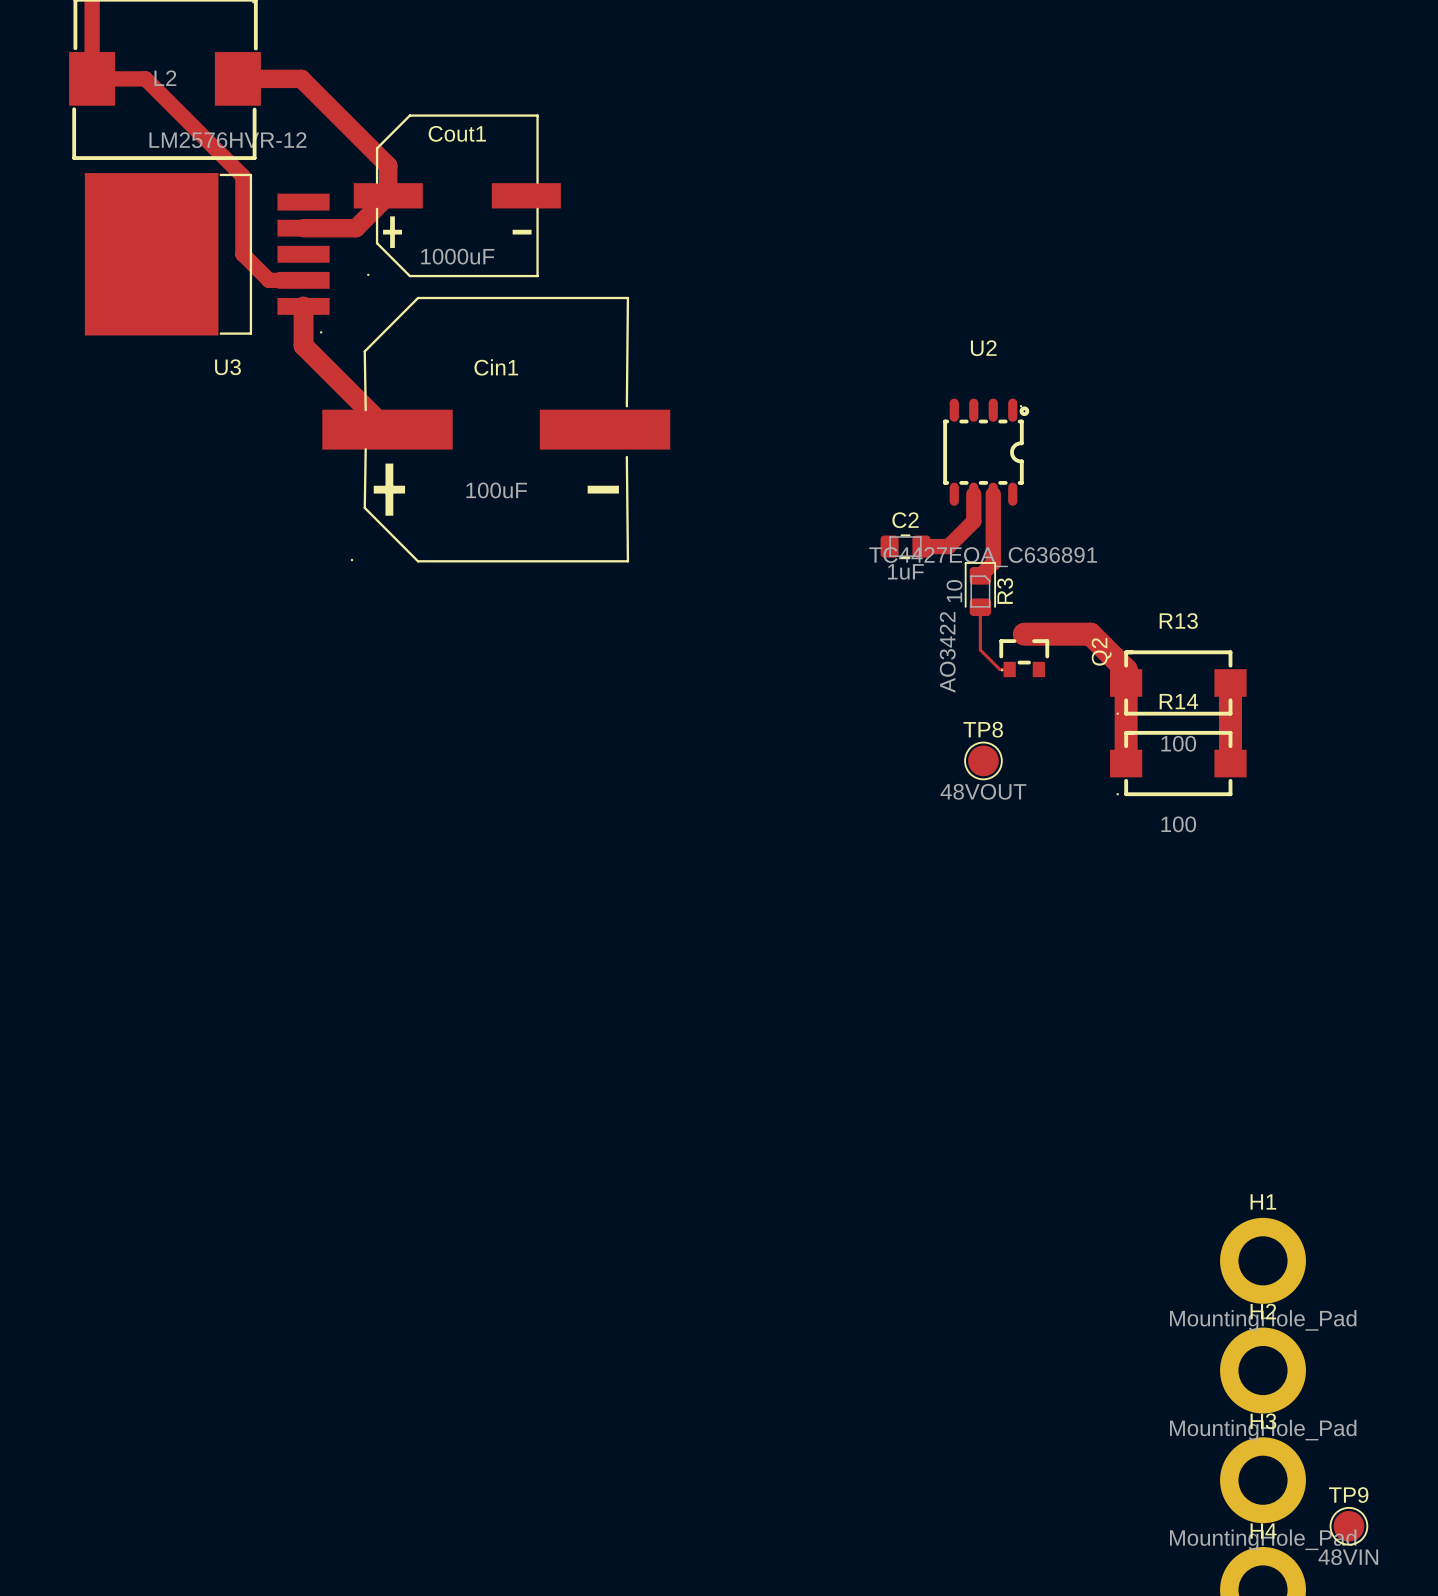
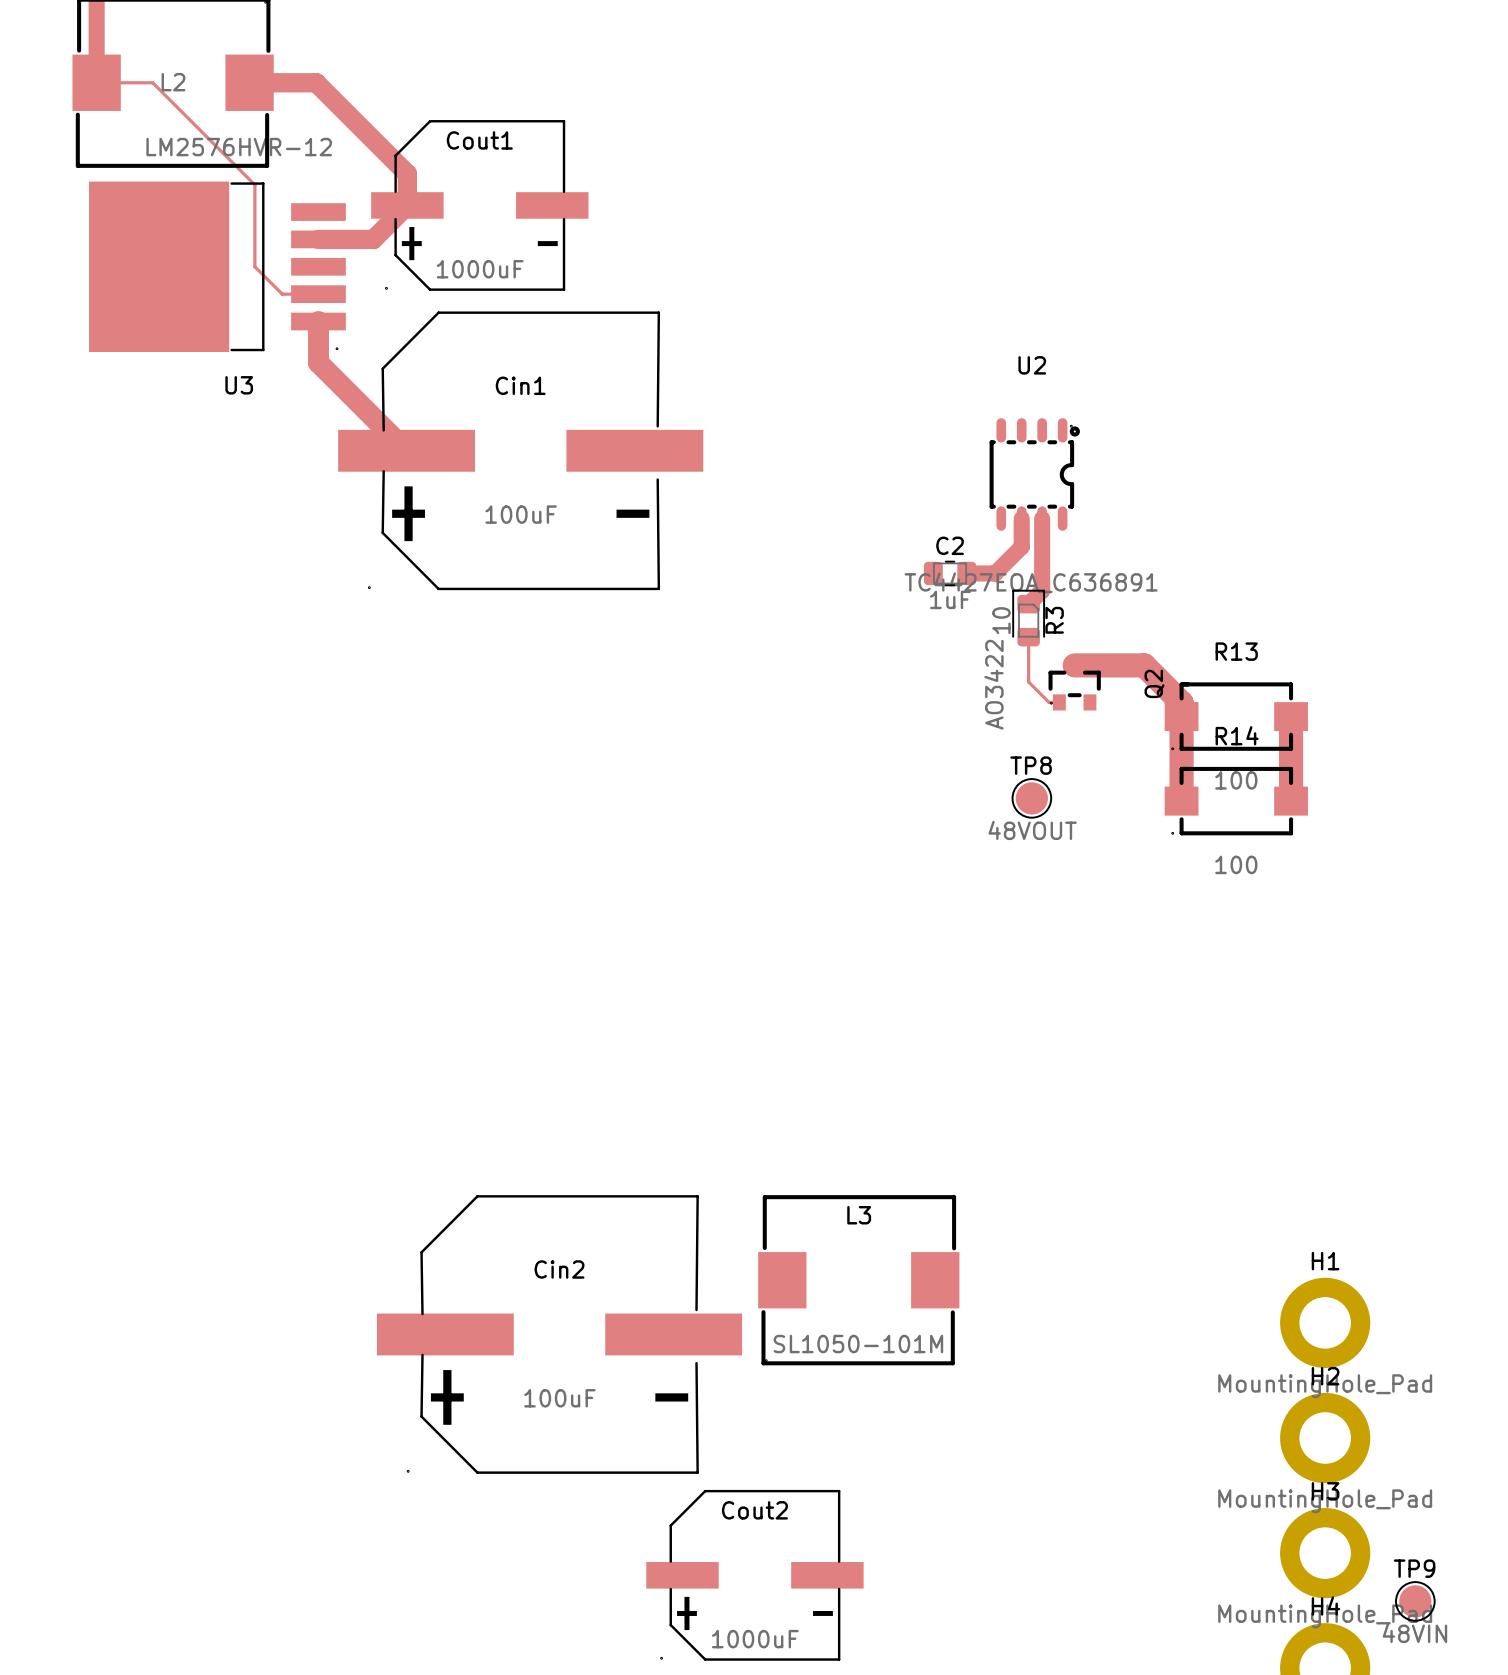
track width: thick (92, 78) (145, 78) (242, 176) (242, 254) (269, 280) (303, 280) -> thin (96, 82) (152, 82) (254, 185) (254, 266) (282, 294) (318, 294)
L3: none -> SL1050-101M (858, 1280)
Cin2: none -> 100uF (559, 1334)
Cout2: none -> 1000uF (754, 1575)

